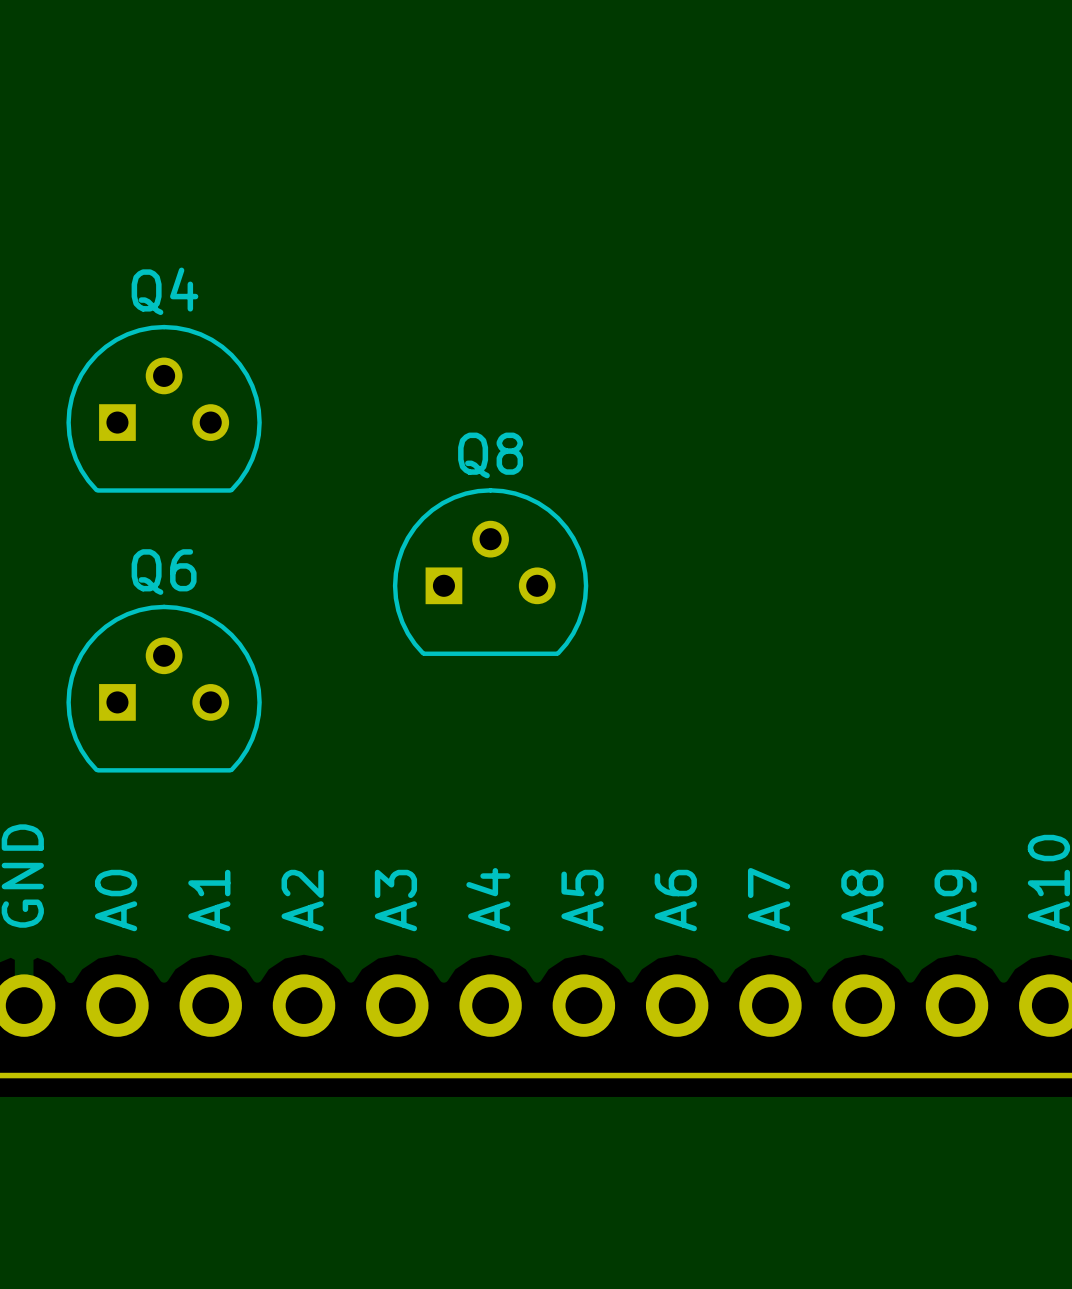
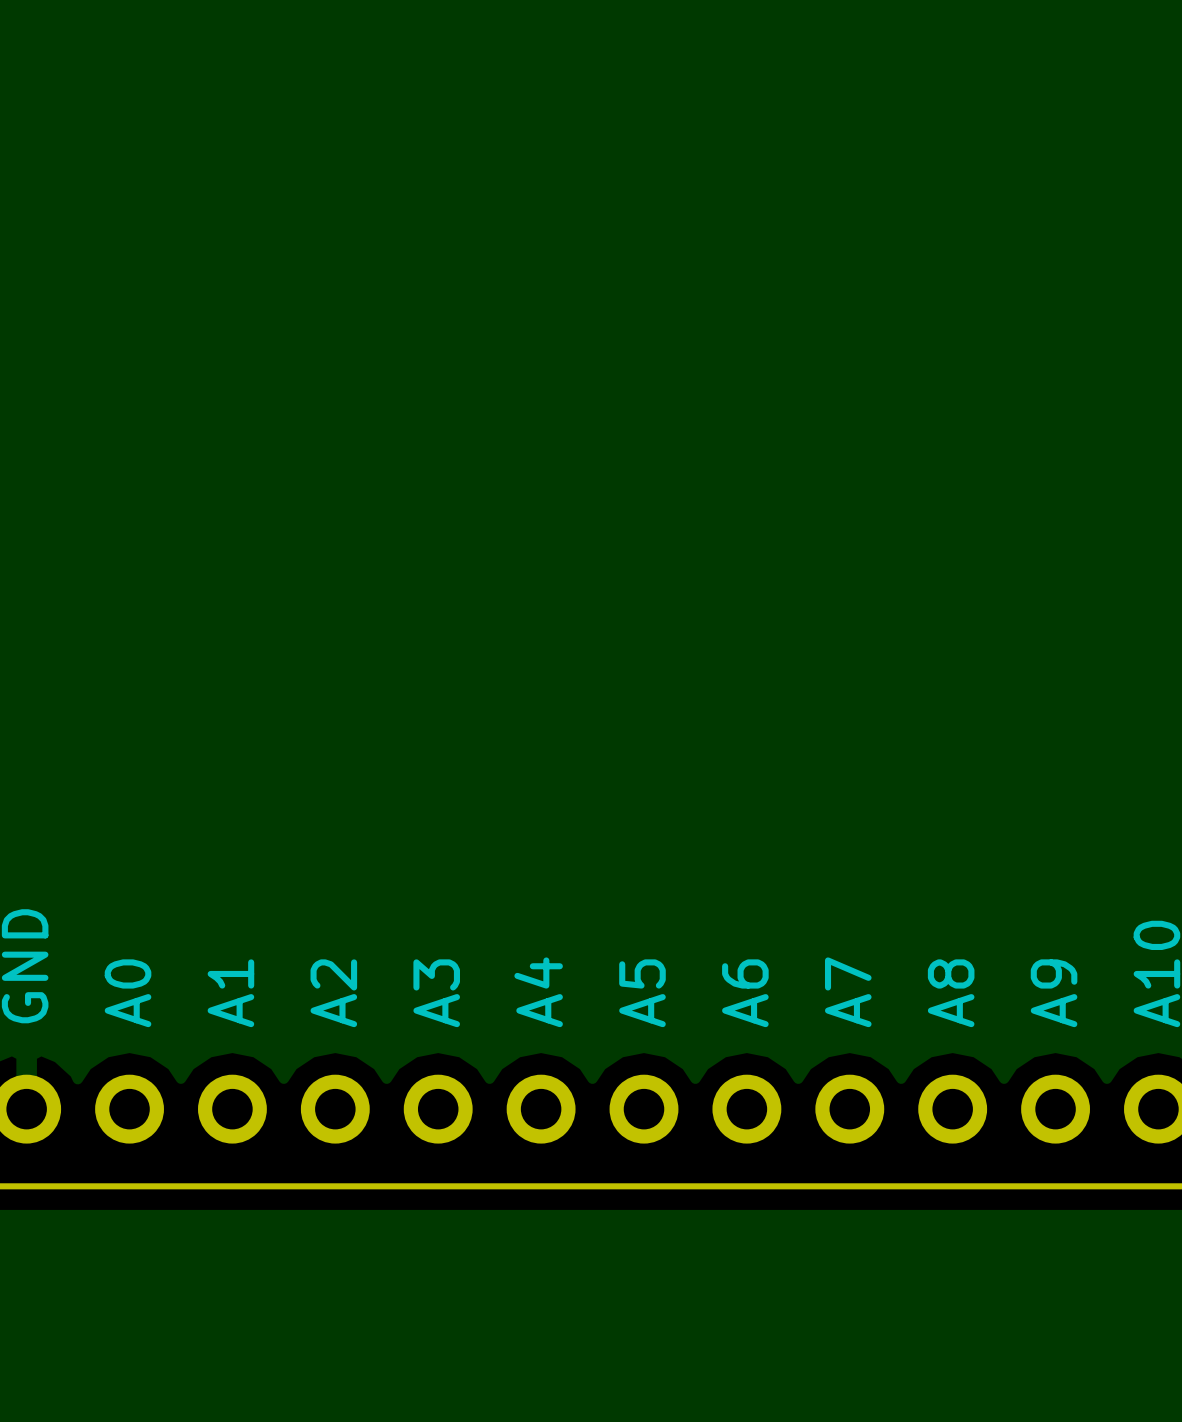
Q4: (164, 408) -> none
Q8: (490, 572) -> none
Q6: (164, 688) -> none

